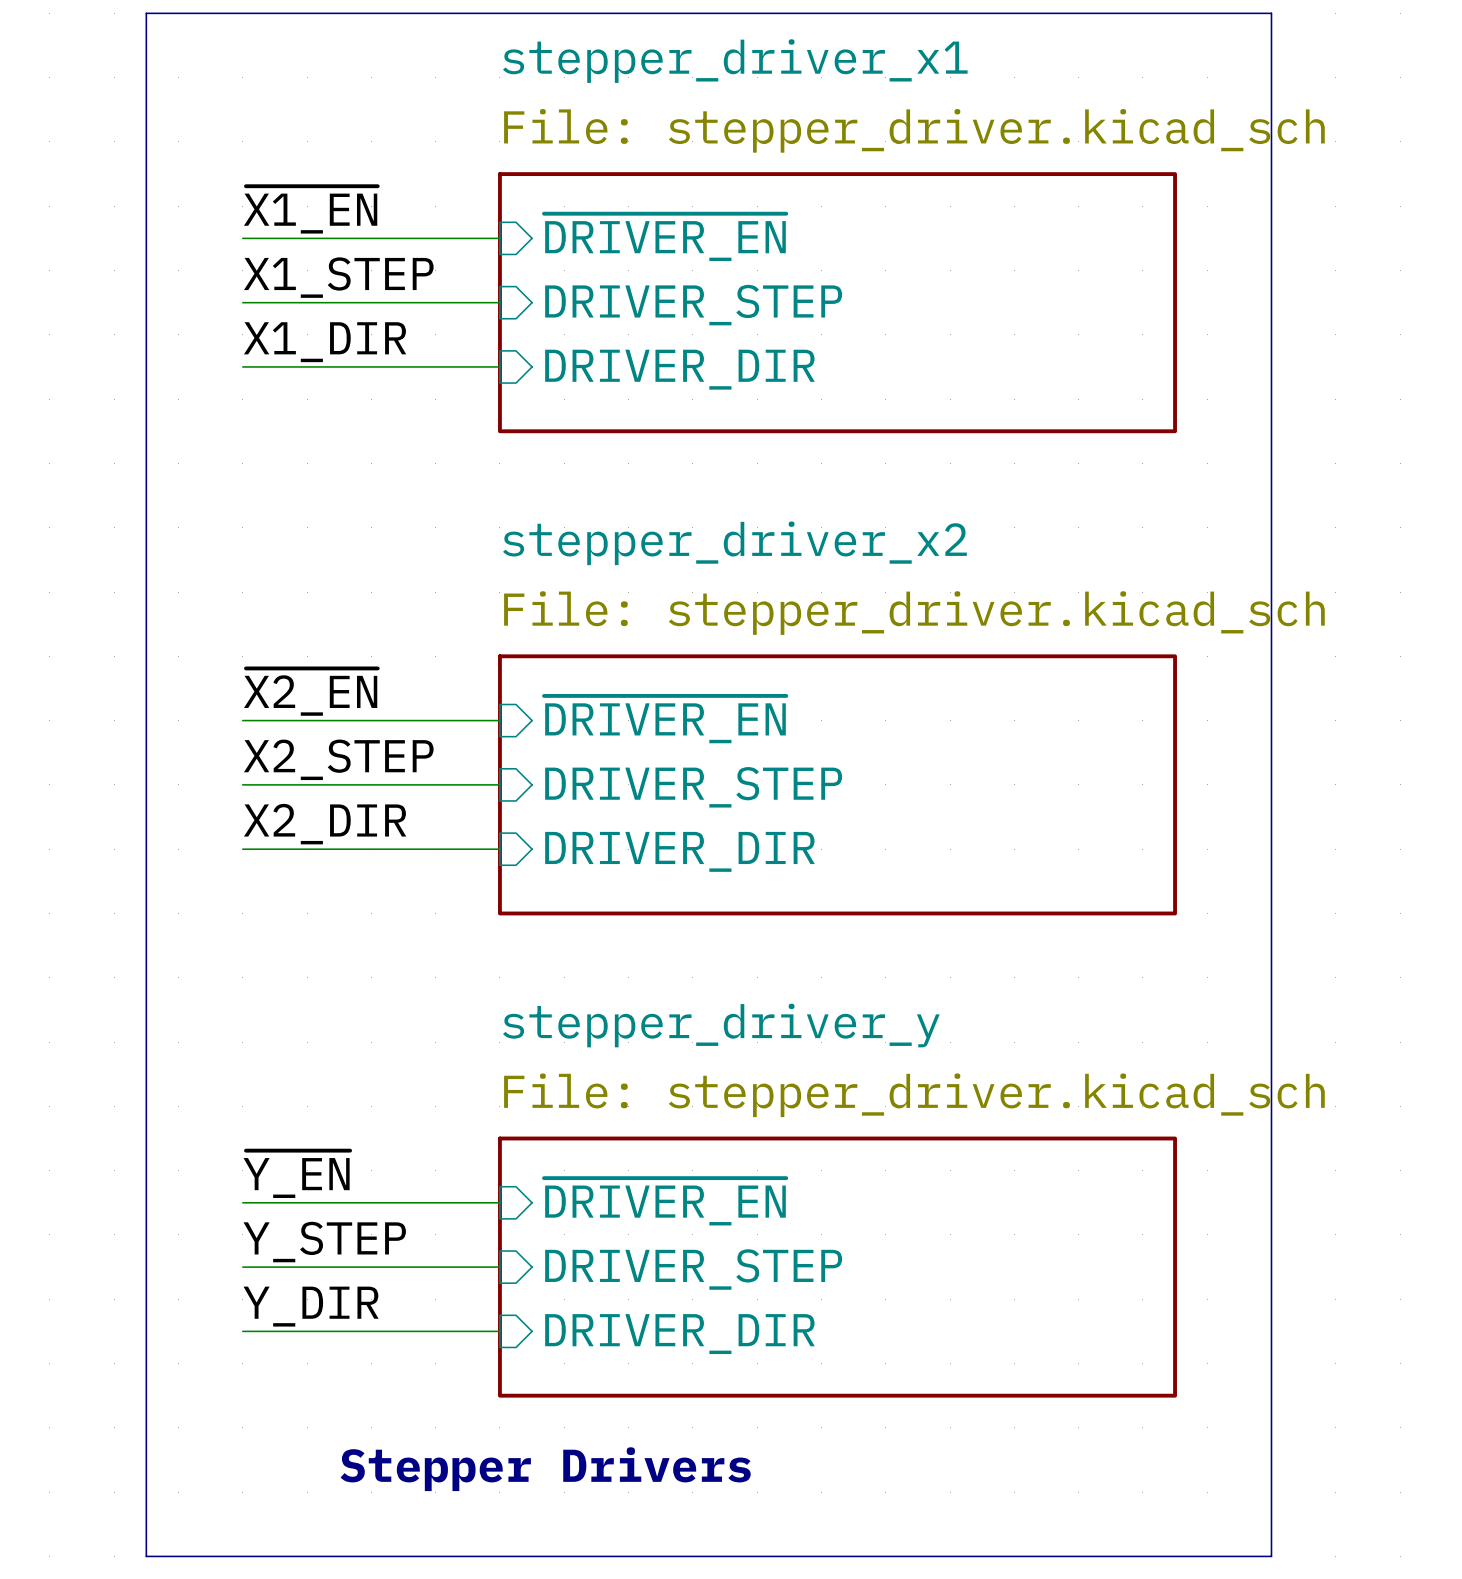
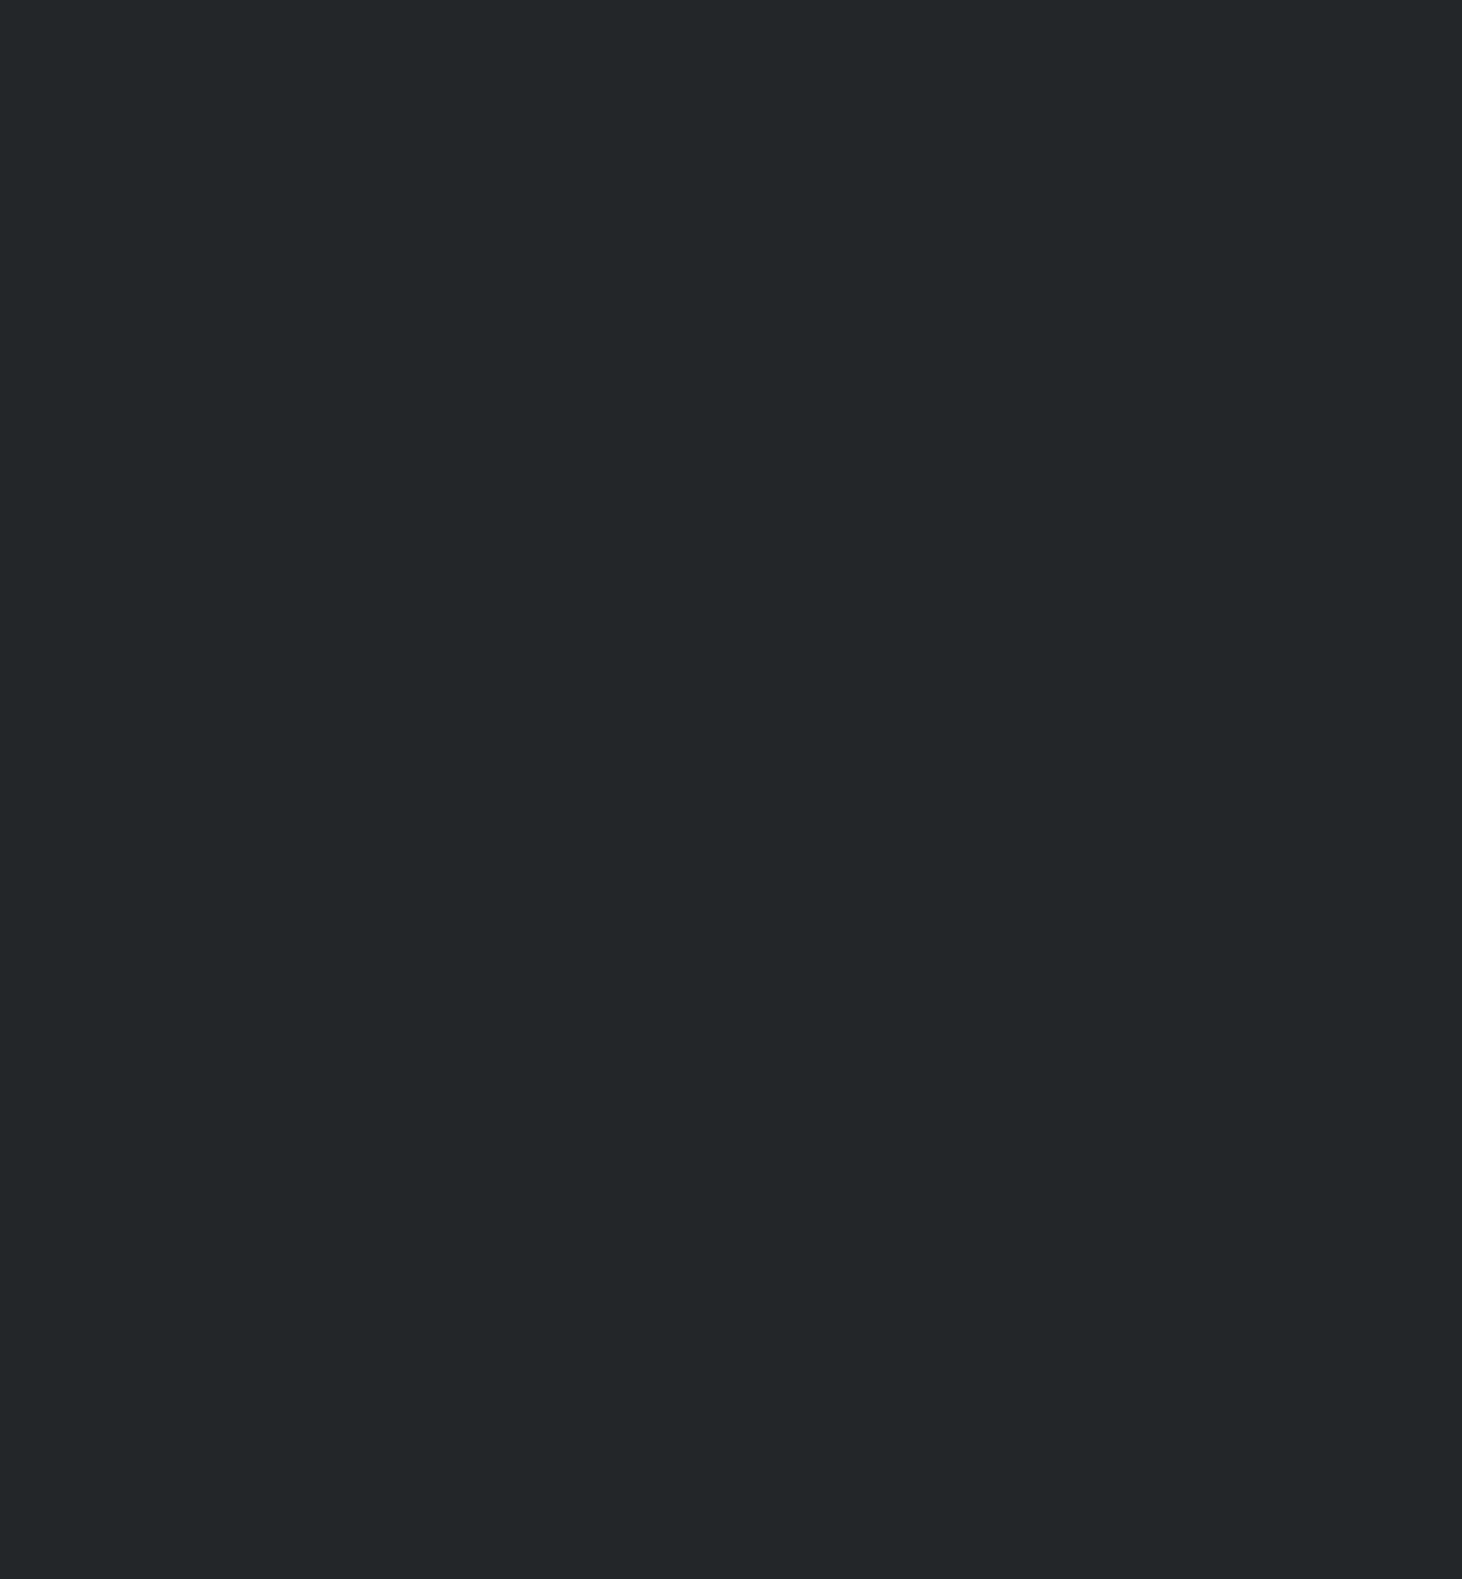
line: (146, 13) (1271, 13) (1271, 1556) (146, 1556) (146, 13) -> none
label: ~{X1_EN} (310, 209) -> none
sheet pin: ~{DRIVER_EN} (665, 237) -> none
wire: (242, 238) (499, 238) -> none
label: X1_STEP (338, 277) -> none
wire: (242, 302) (499, 302) -> none
sheet stepper_driver_x1: File: stepper_driver.kicad_sch (837, 302) -> none
sheet pin: DRIVER_STEP (693, 305) -> none
label: X1_DIR (325, 342) -> none
wire: (242, 366) (499, 366) -> none
sheet pin: DRIVER_DIR (679, 369) -> none
label: ~{X2_EN} (310, 692) -> none
sheet pin: ~{DRIVER_EN} (665, 719) -> none
wire: (242, 720) (499, 720) -> none
label: X2_STEP (338, 759) -> none
wire: (242, 784) (499, 784) -> none
sheet stepper_driver_x2: File: stepper_driver.kicad_sch (837, 784) -> none
sheet pin: DRIVER_STEP (693, 787) -> none
label: X2_DIR (325, 824) -> none
wire: (242, 849) (499, 849) -> none
sheet pin: DRIVER_DIR (679, 851) -> none
label: ~{Y_EN} (296, 1174) -> none
sheet pin: ~{DRIVER_EN} (665, 1201) -> none
wire: (242, 1202) (499, 1202) -> none
label: Y_STEP (324, 1242) -> none
wire: (242, 1267) (499, 1267) -> none
sheet stepper_driver_y: File: stepper_driver.kicad_sch (837, 1267) -> none
sheet pin: DRIVER_STEP (693, 1269) -> none
label: Y_DIR (311, 1306) -> none
wire: (242, 1331) (499, 1331) -> none
sheet pin: DRIVER_DIR (679, 1334) -> none
text: Stepper Drivers (545, 1469) -> none

